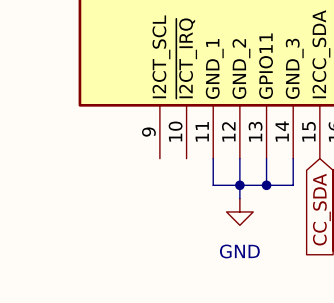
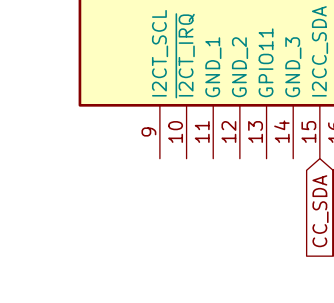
wire: (213, 158) (213, 185) (293, 185) (293, 158) -> none
wire: (239, 158) (239, 198) -> none
wire: (266, 158) (266, 185) -> none
junction: (239, 185) -> none
junction: (266, 185) -> none
power symbol: GND (239, 211) -> none

